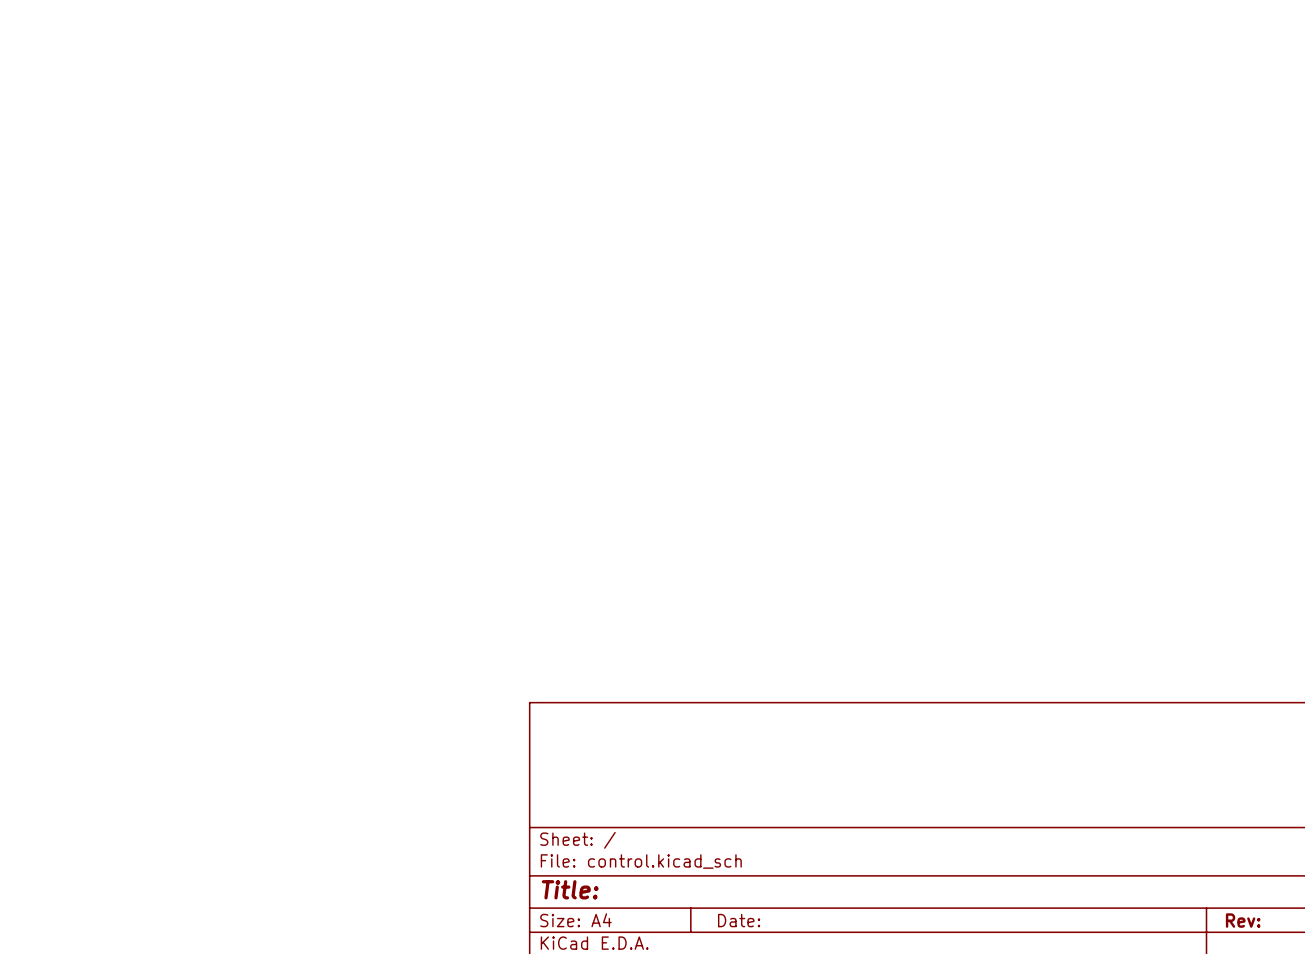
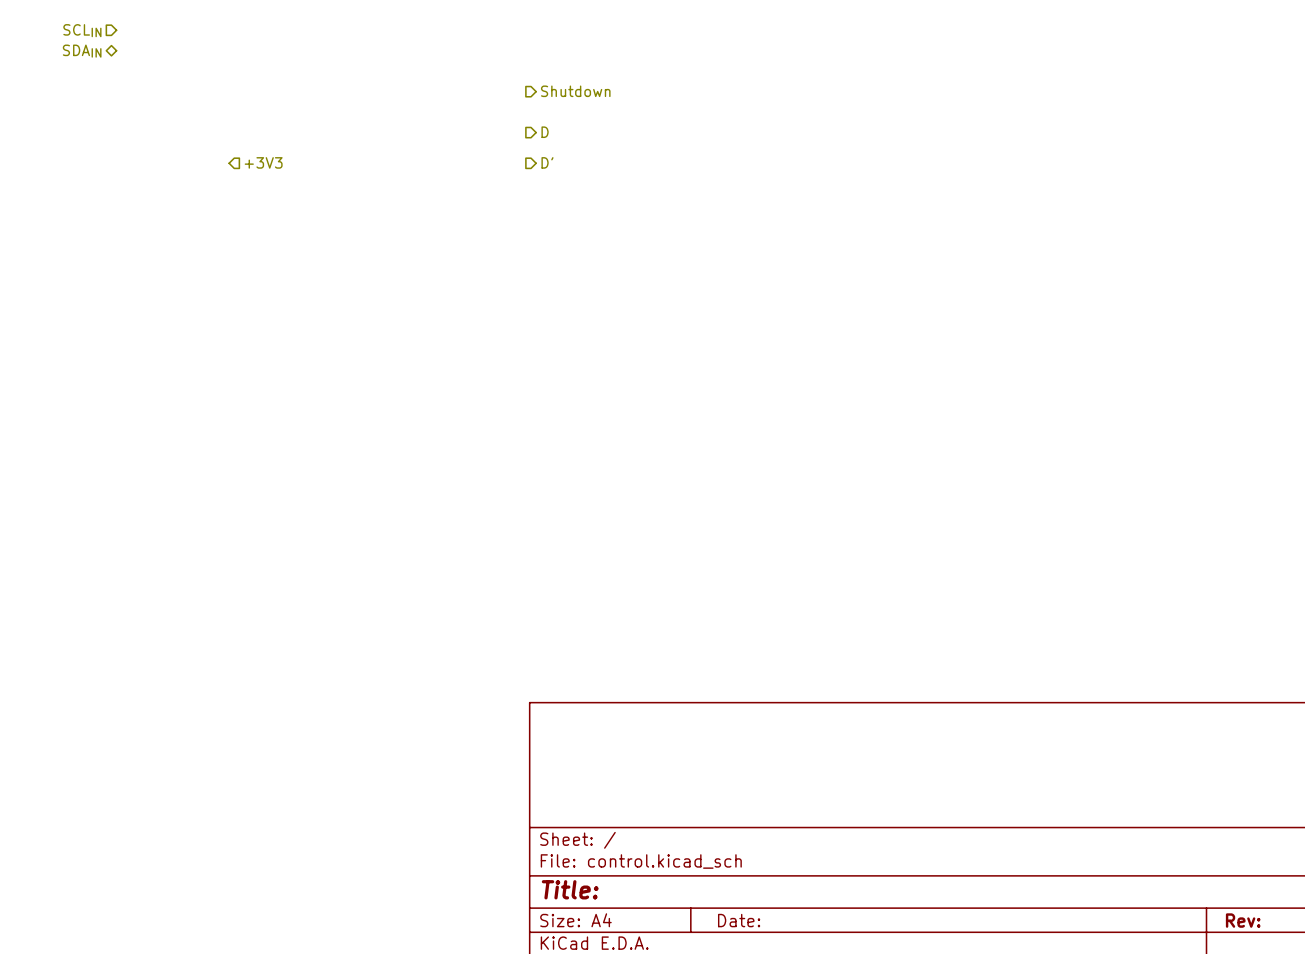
hierarchical label: none -> SCLIN (82, 30)
hierarchical label: none -> SDAIN (82, 51)
hierarchical label: none -> Shutdown (575, 91)
hierarchical label: none -> D (545, 132)
hierarchical label: none -> +3V3 (263, 162)
hierarchical label: none -> D' (547, 162)

